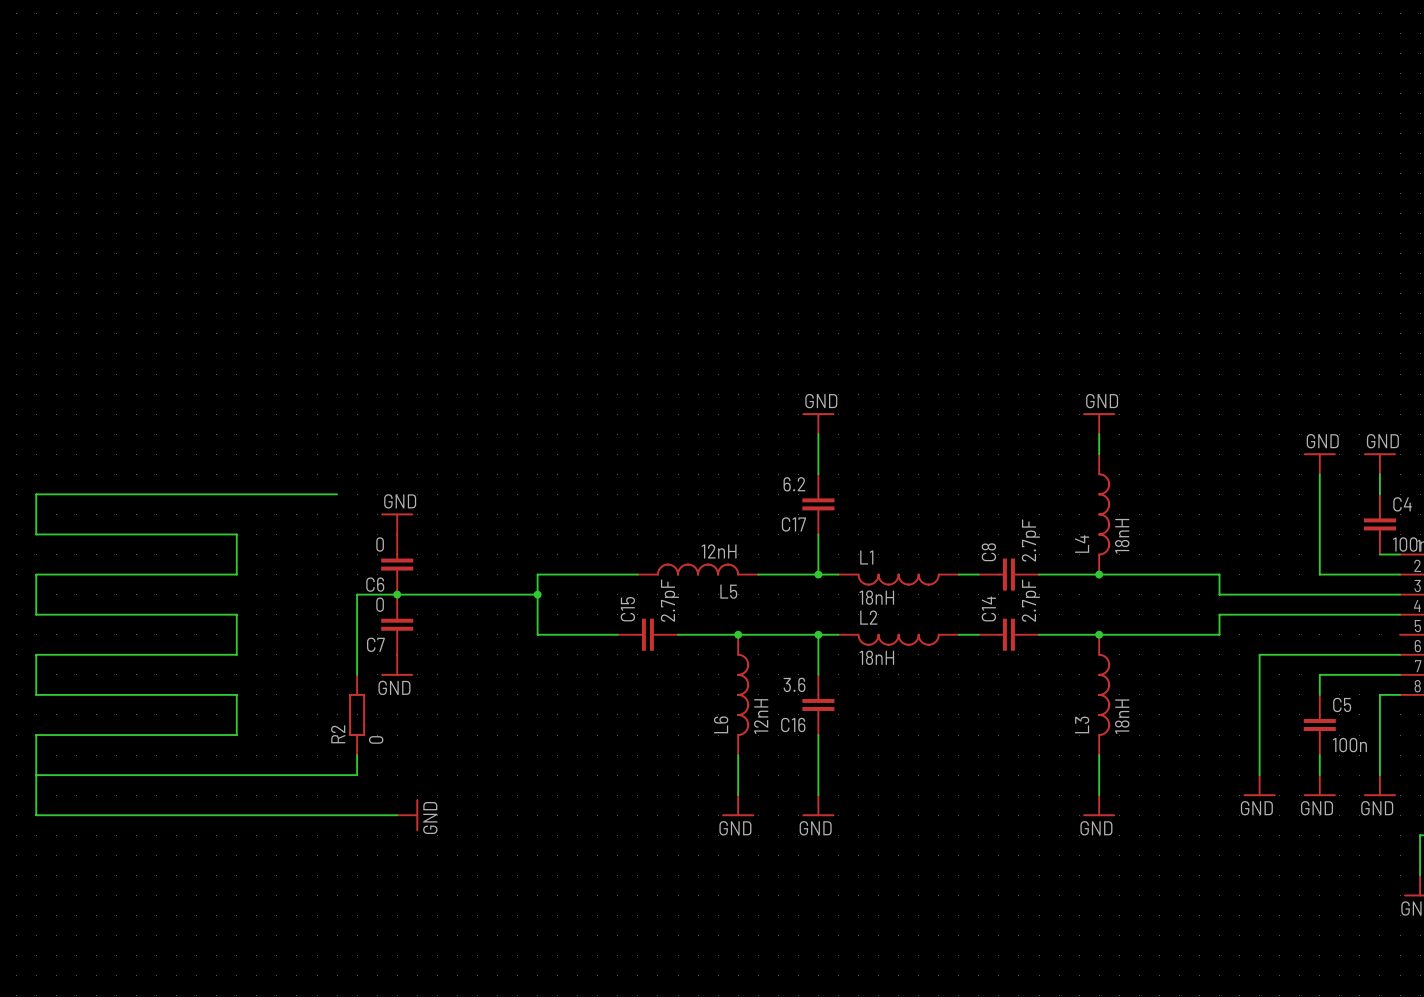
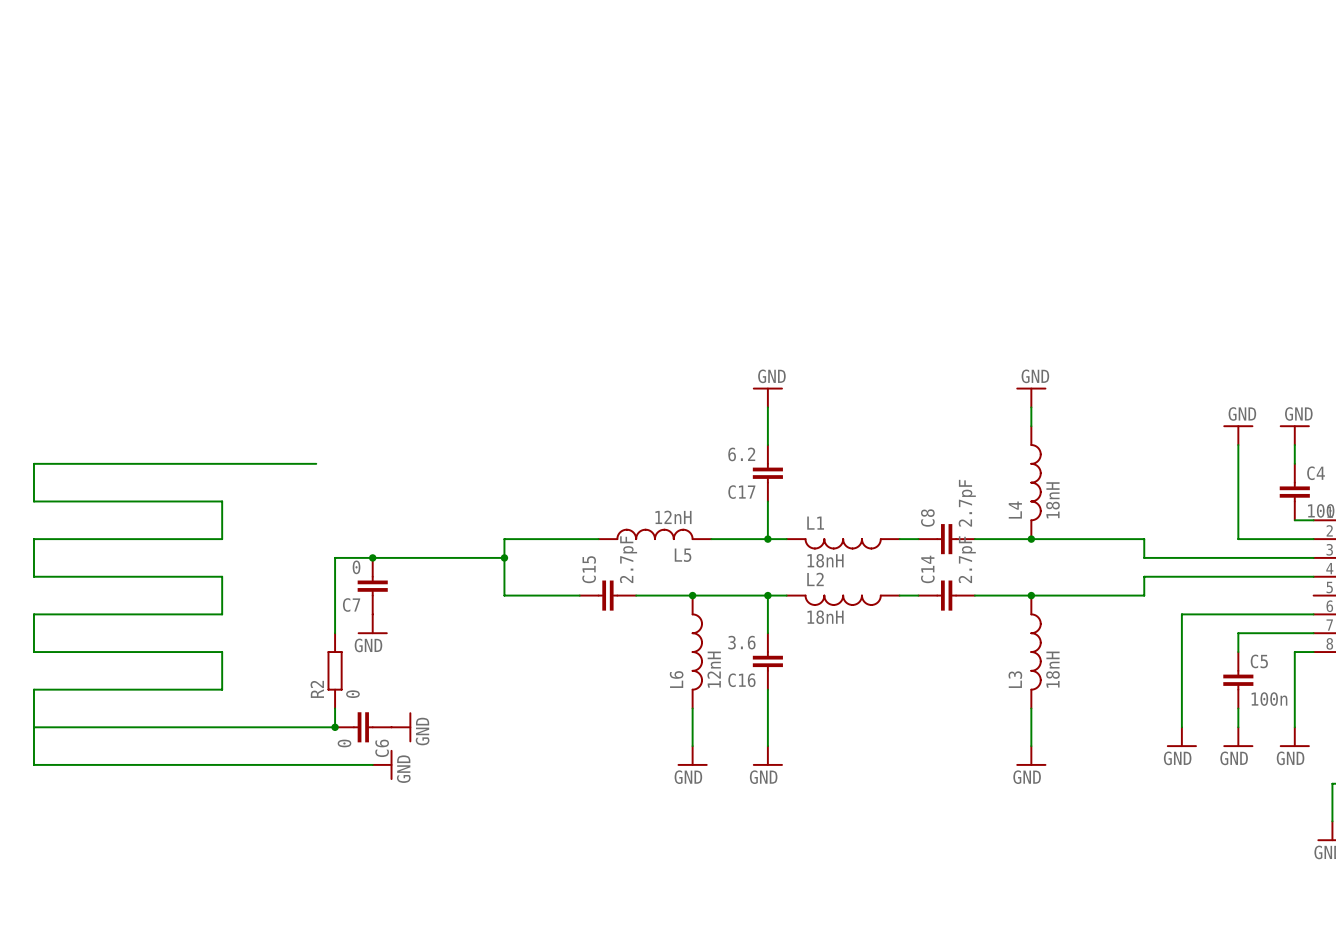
power symbol: GND (397, 523) -> none
C6 value position: 0 (380, 544) -> 0 (344, 743)
C6 rotation: 0° (397, 564) -> 90° clockwise (363, 727)
C6 position: (397, 564) -> (363, 727)
C6 name position: C6 (375, 584) -> C6 (382, 748)
junction: none -> (335, 727)
power symbol: none -> GND (401, 727)

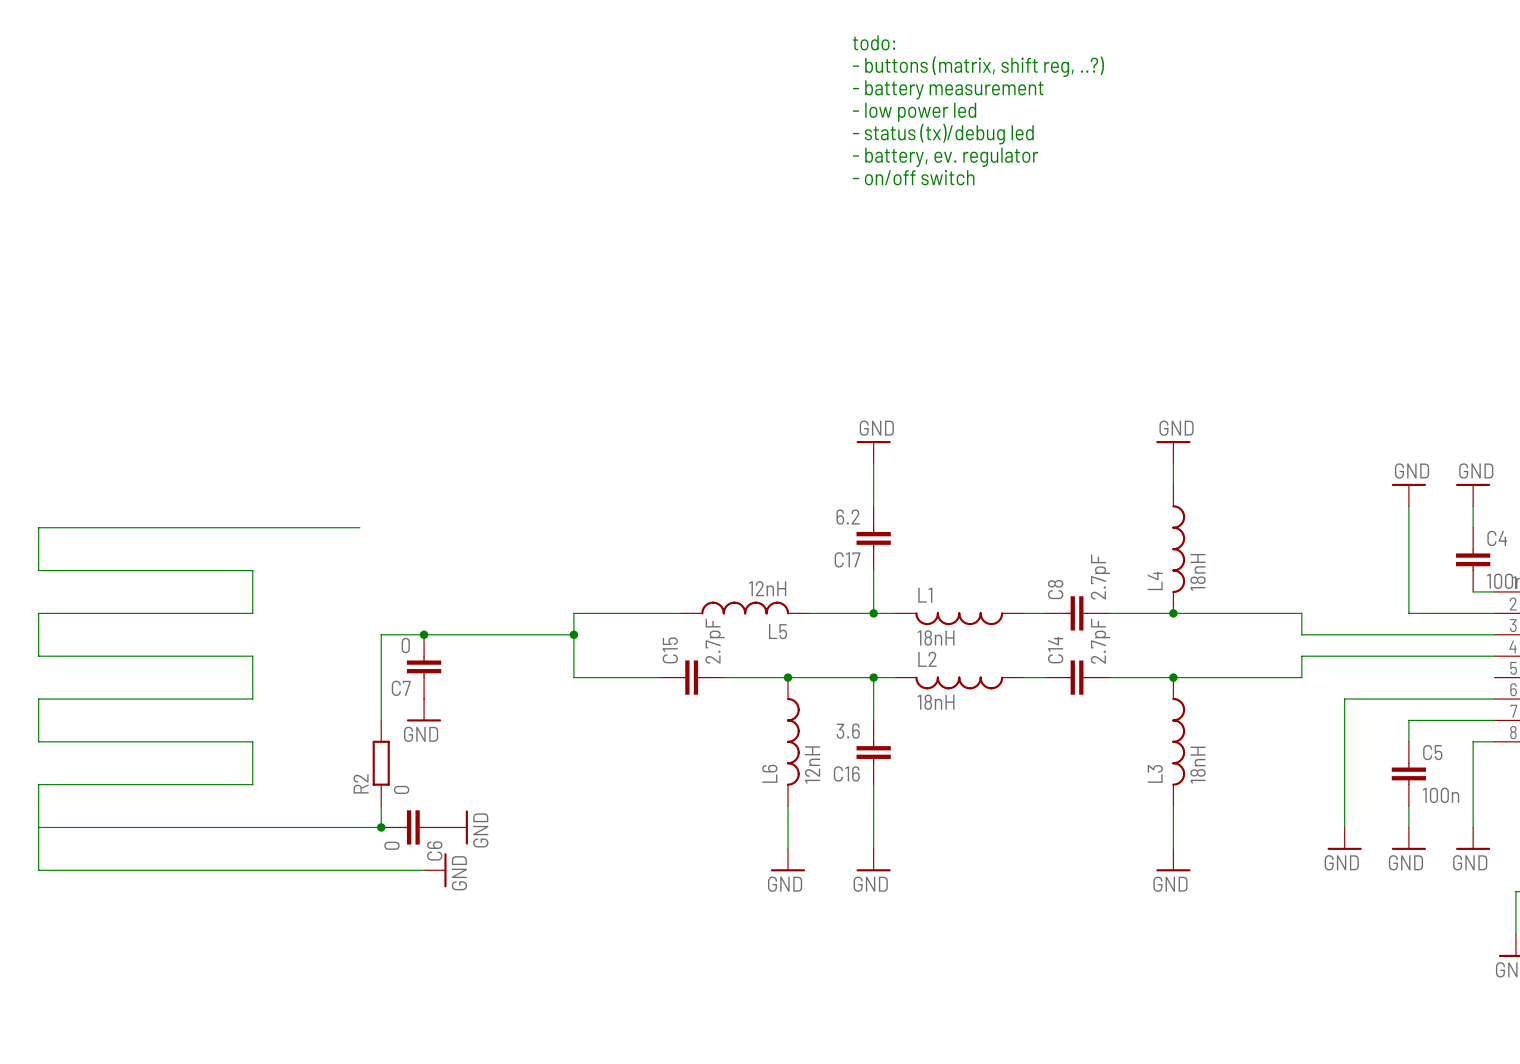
text: none -> todo: (874, 42)
text: none -> - buttons (matrix, shift reg, ..?) (978, 66)
text: none -> - battery measurement (948, 89)
text: none -> - low power led (914, 112)
text: none -> - status (tx)/debug led (943, 134)
text: none -> - battery, ev. regulator (945, 157)
text: none -> - on/off switch (913, 177)

